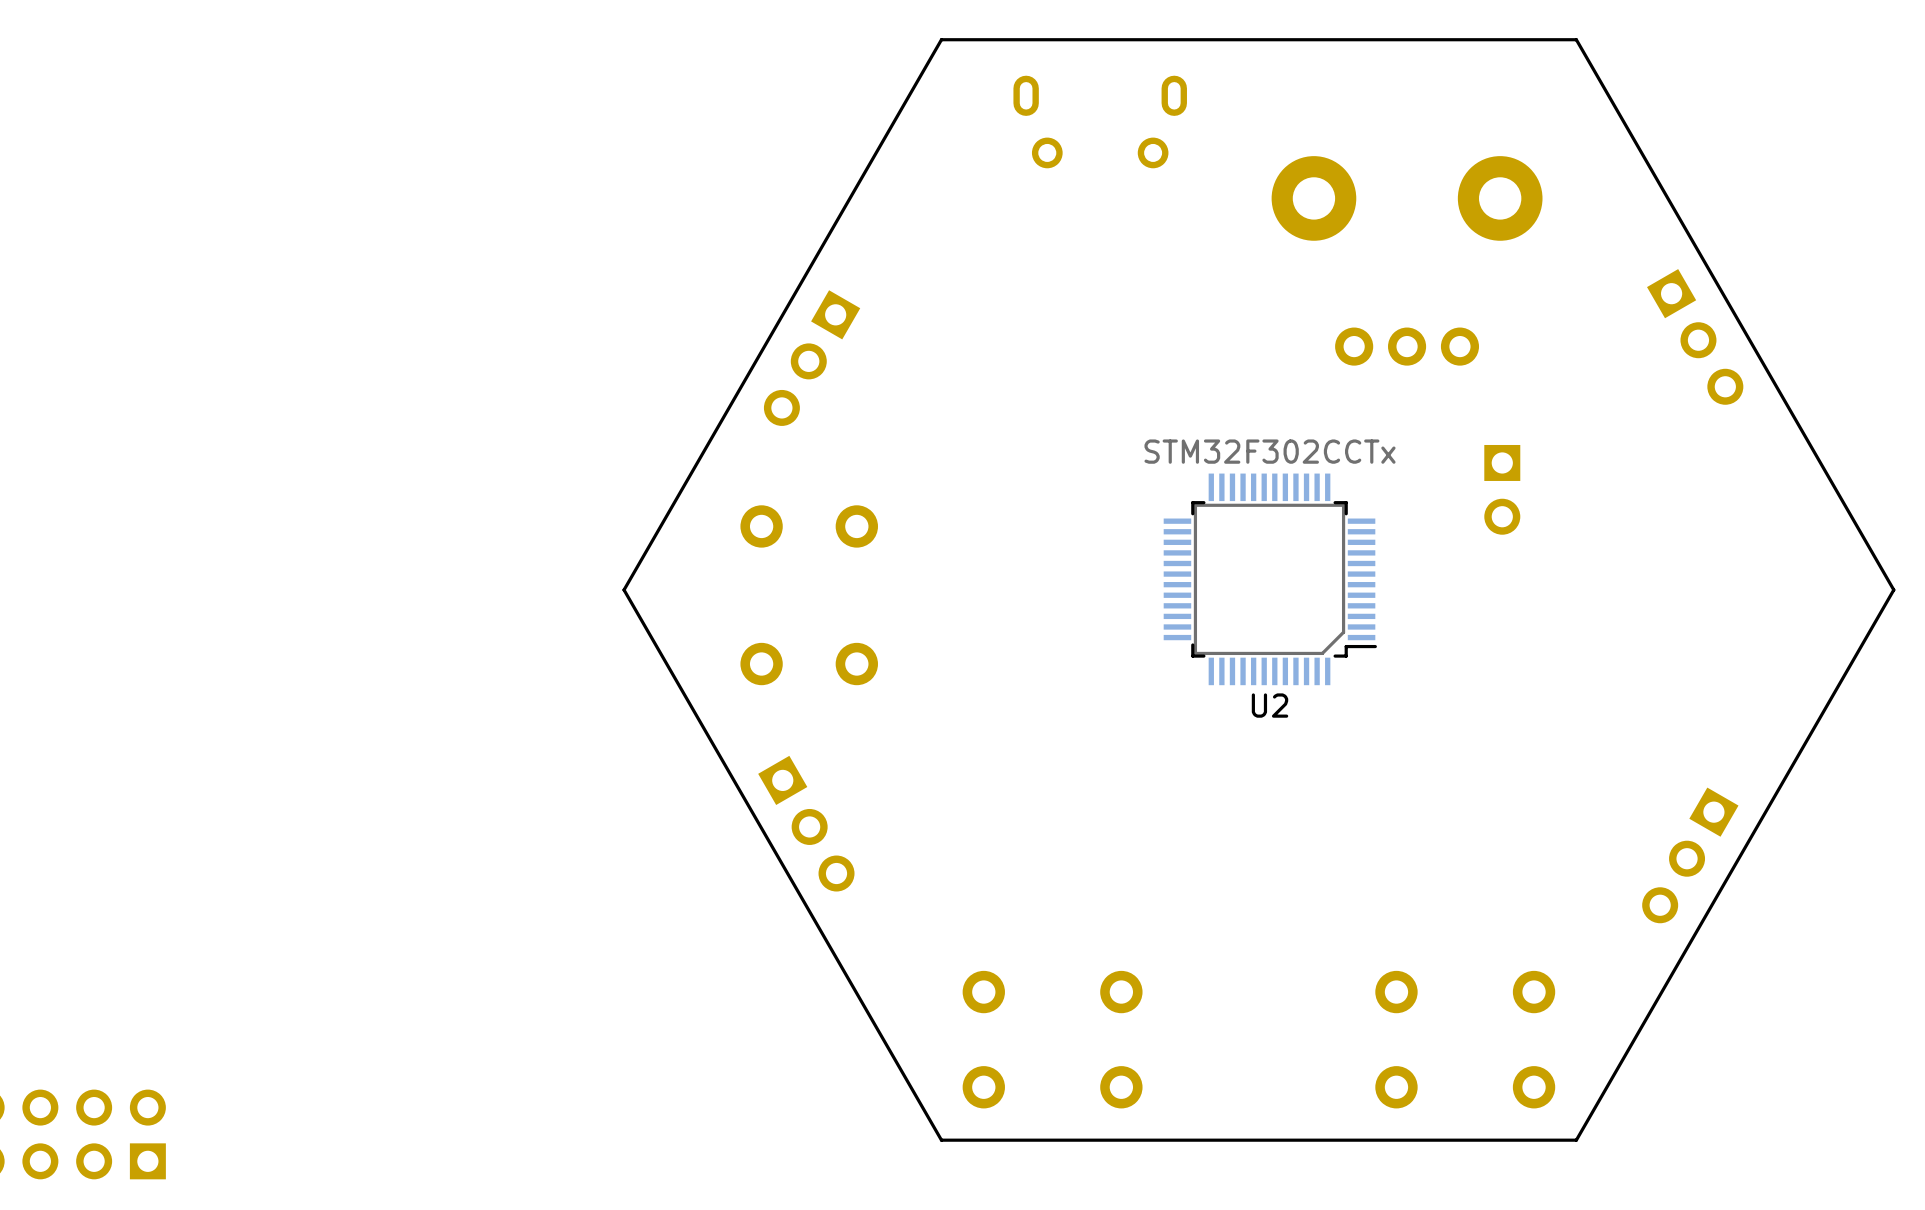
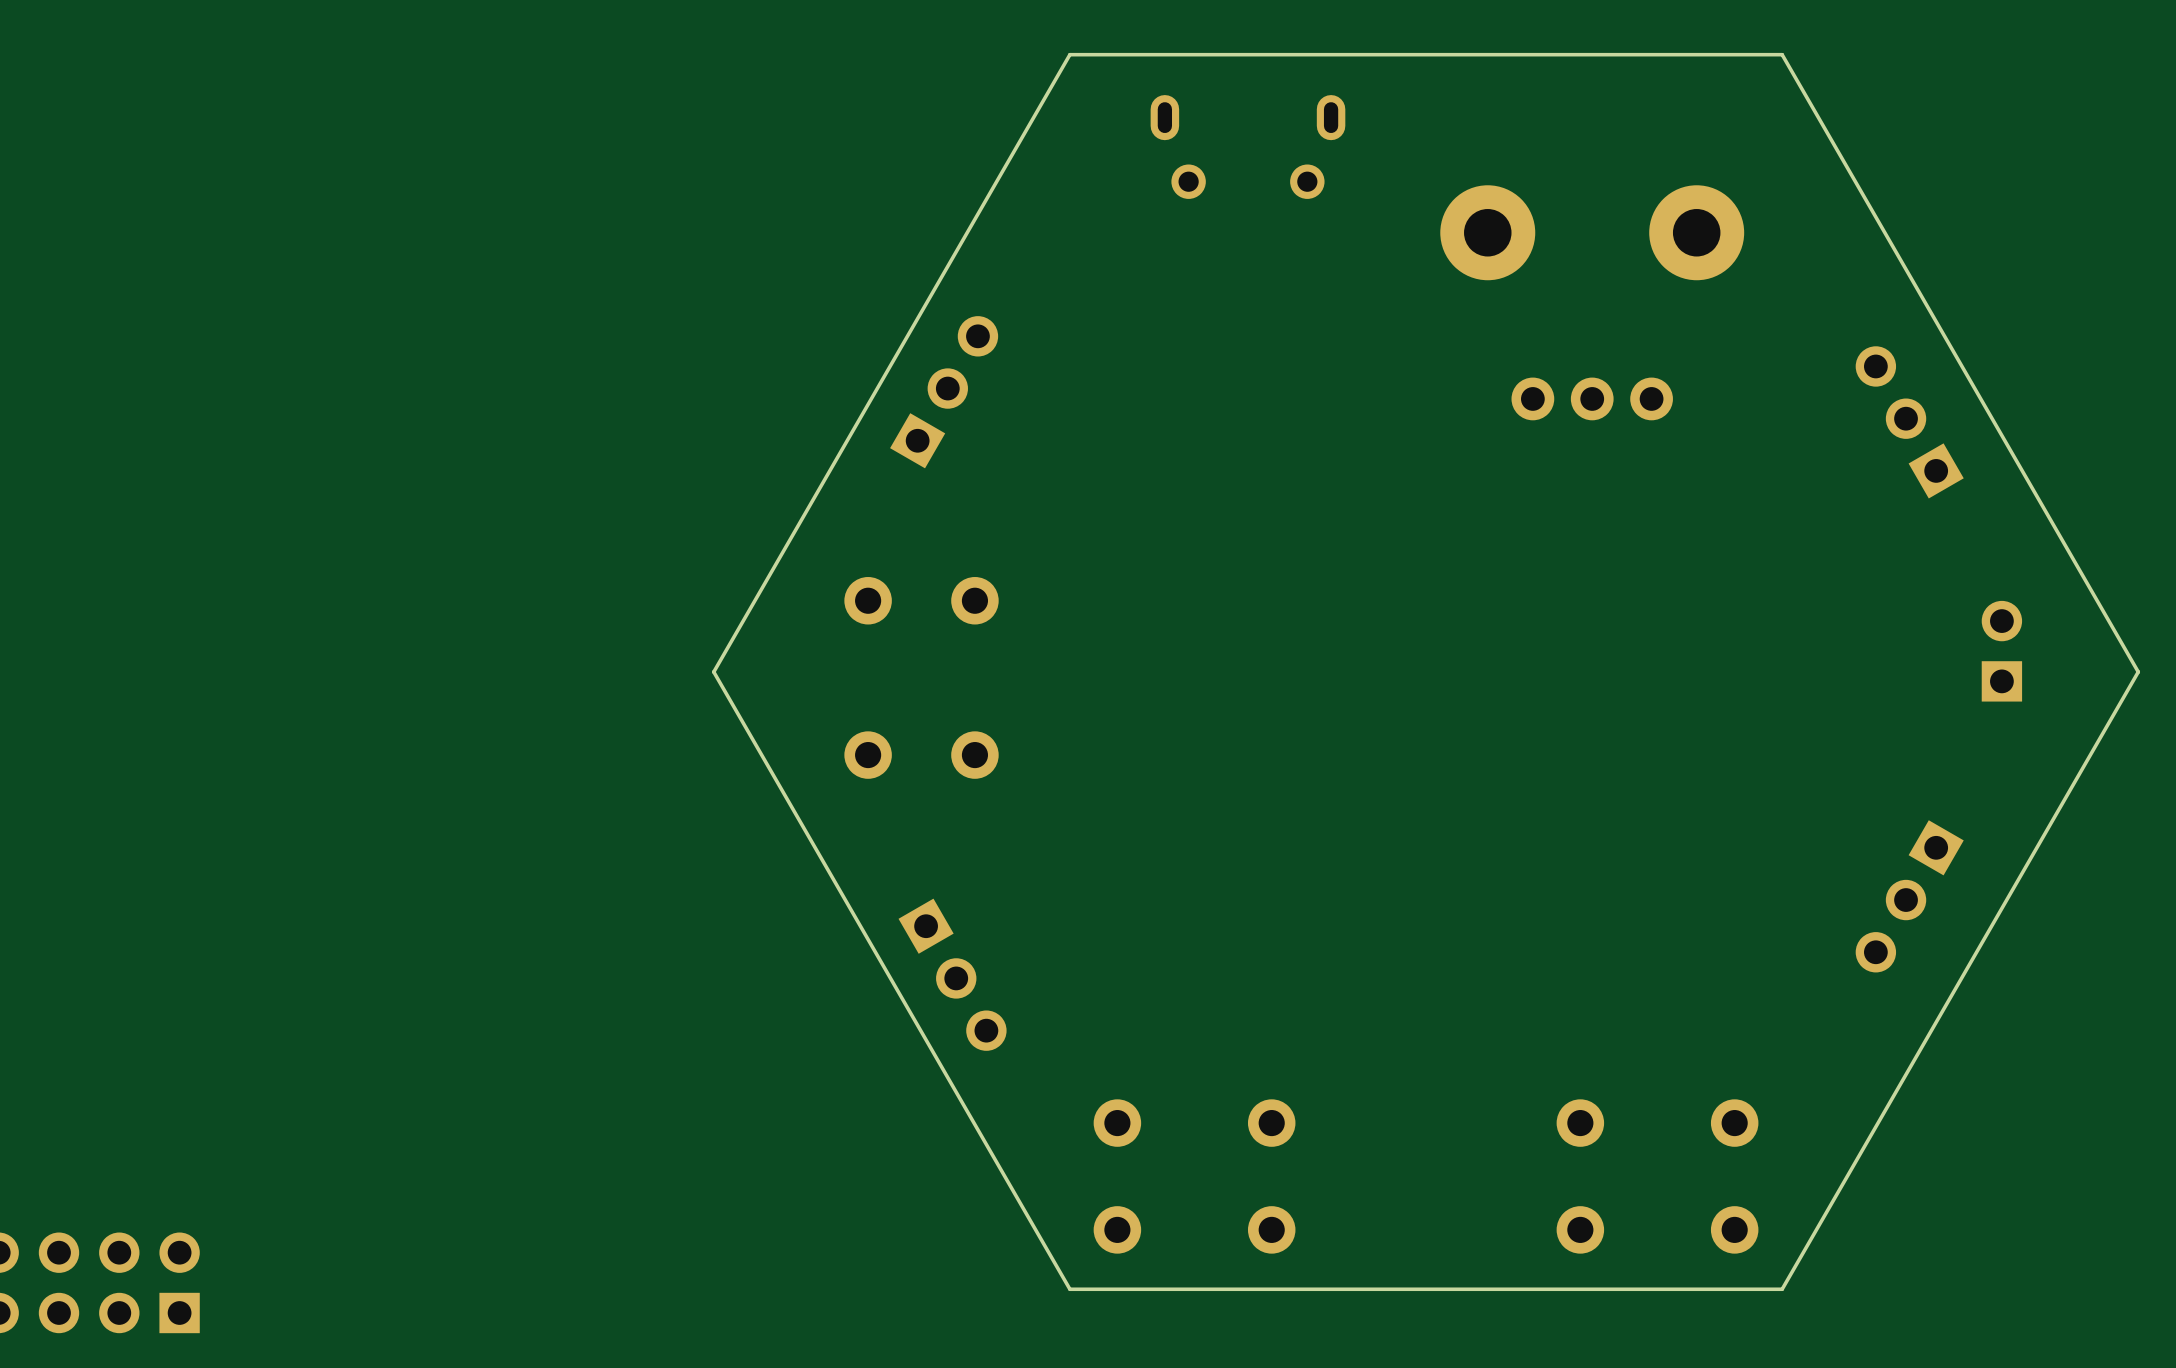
part rotation: 0° (1695, 336) -> 180° (1909, 422)
part rotation: 0° (812, 358) -> 180° (944, 392)
part rotation: 0° (1502, 489) -> 180° (2001, 651)
part position: (1502, 489) -> (2001, 651)
U2: STM32F302CCTx (1270, 579) -> none
part position: (806, 823) -> (952, 974)
part position: (1690, 855) -> (1909, 896)

